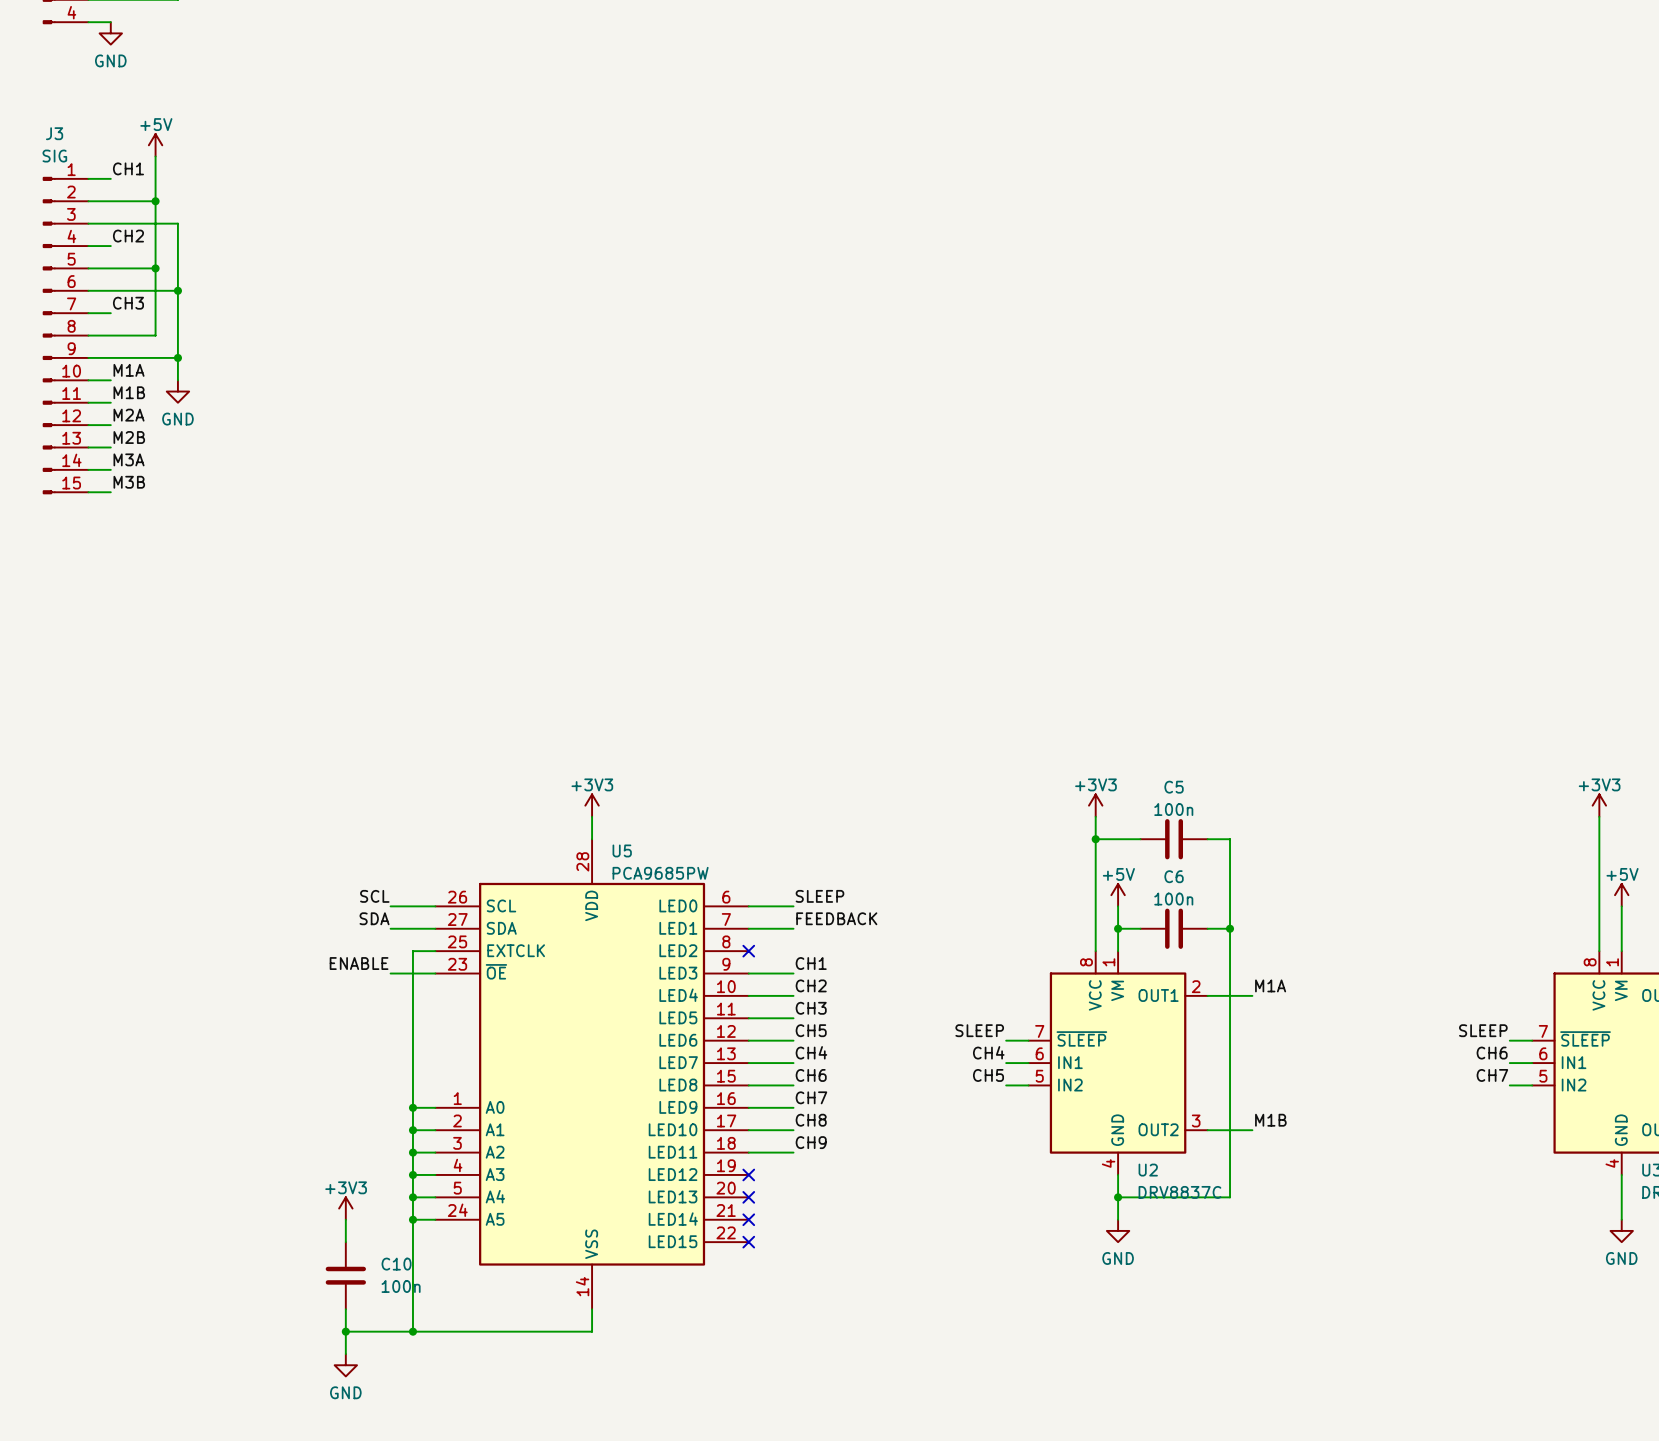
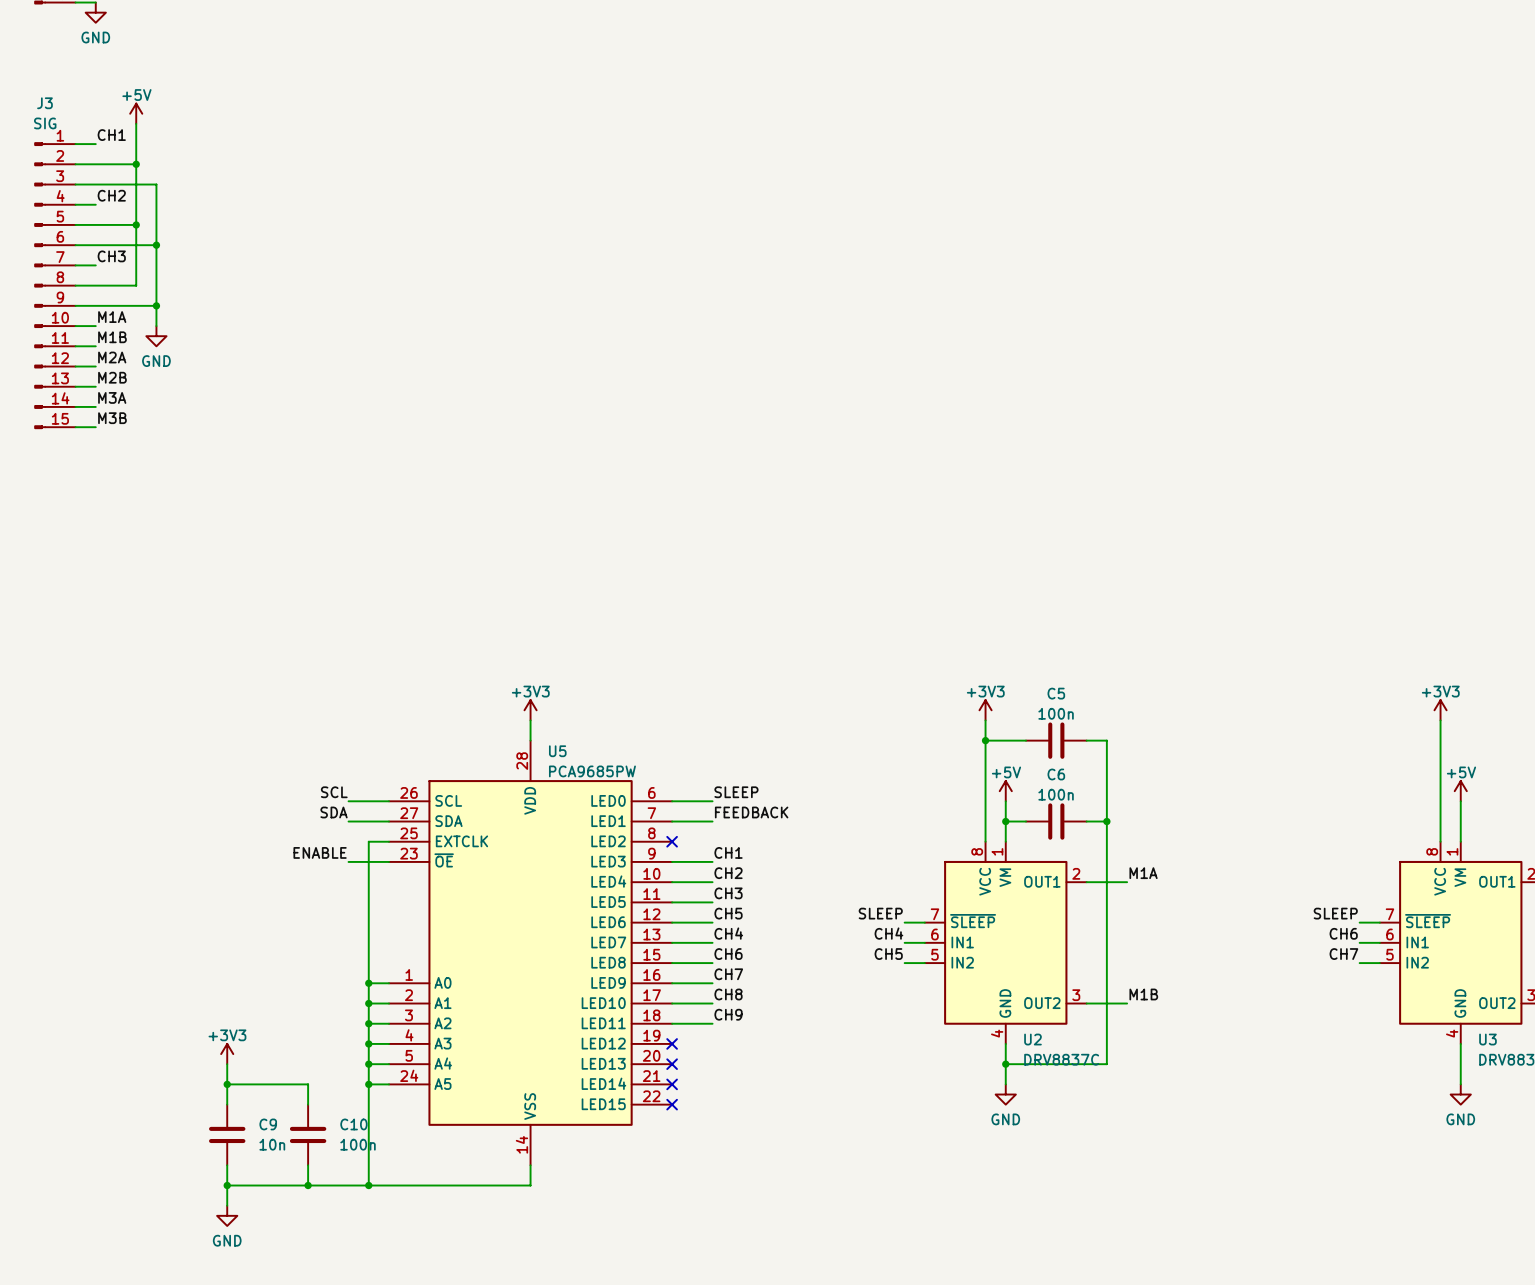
wire: none -> (227, 1064) (227, 1104)
power symbol position: +3V3 (345, 1208) -> +3V3 (227, 1054)
wire: none -> (227, 1084) (308, 1084)
junction: none -> (227, 1084)
C9: none -> 10n (227, 1134)
wire: none -> (227, 1165) (227, 1205)
junction: none -> (227, 1185)
wire: (345, 1331) (345, 1354) -> (308, 1185) (227, 1185)
power symbol position: GND (345, 1365) -> GND (227, 1215)

